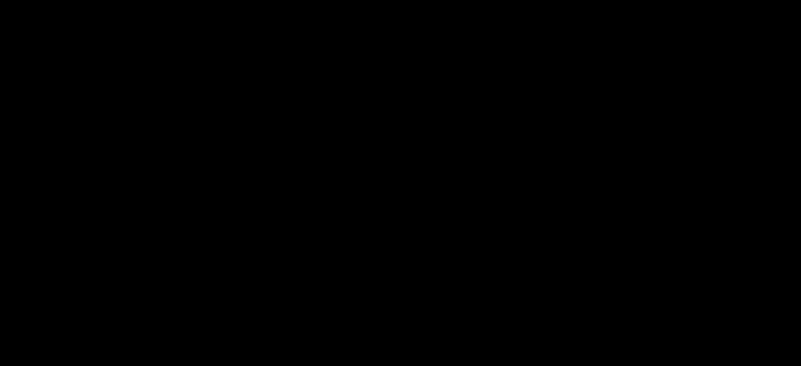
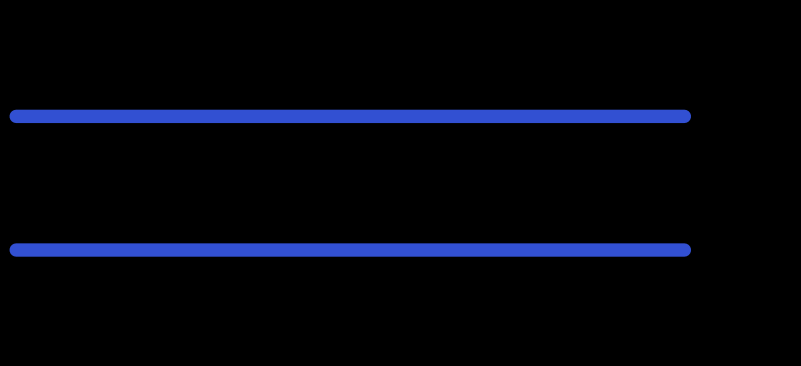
bottom track: none -> (16, 116) (684, 116)
bottom track: none -> (16, 250) (684, 250)

